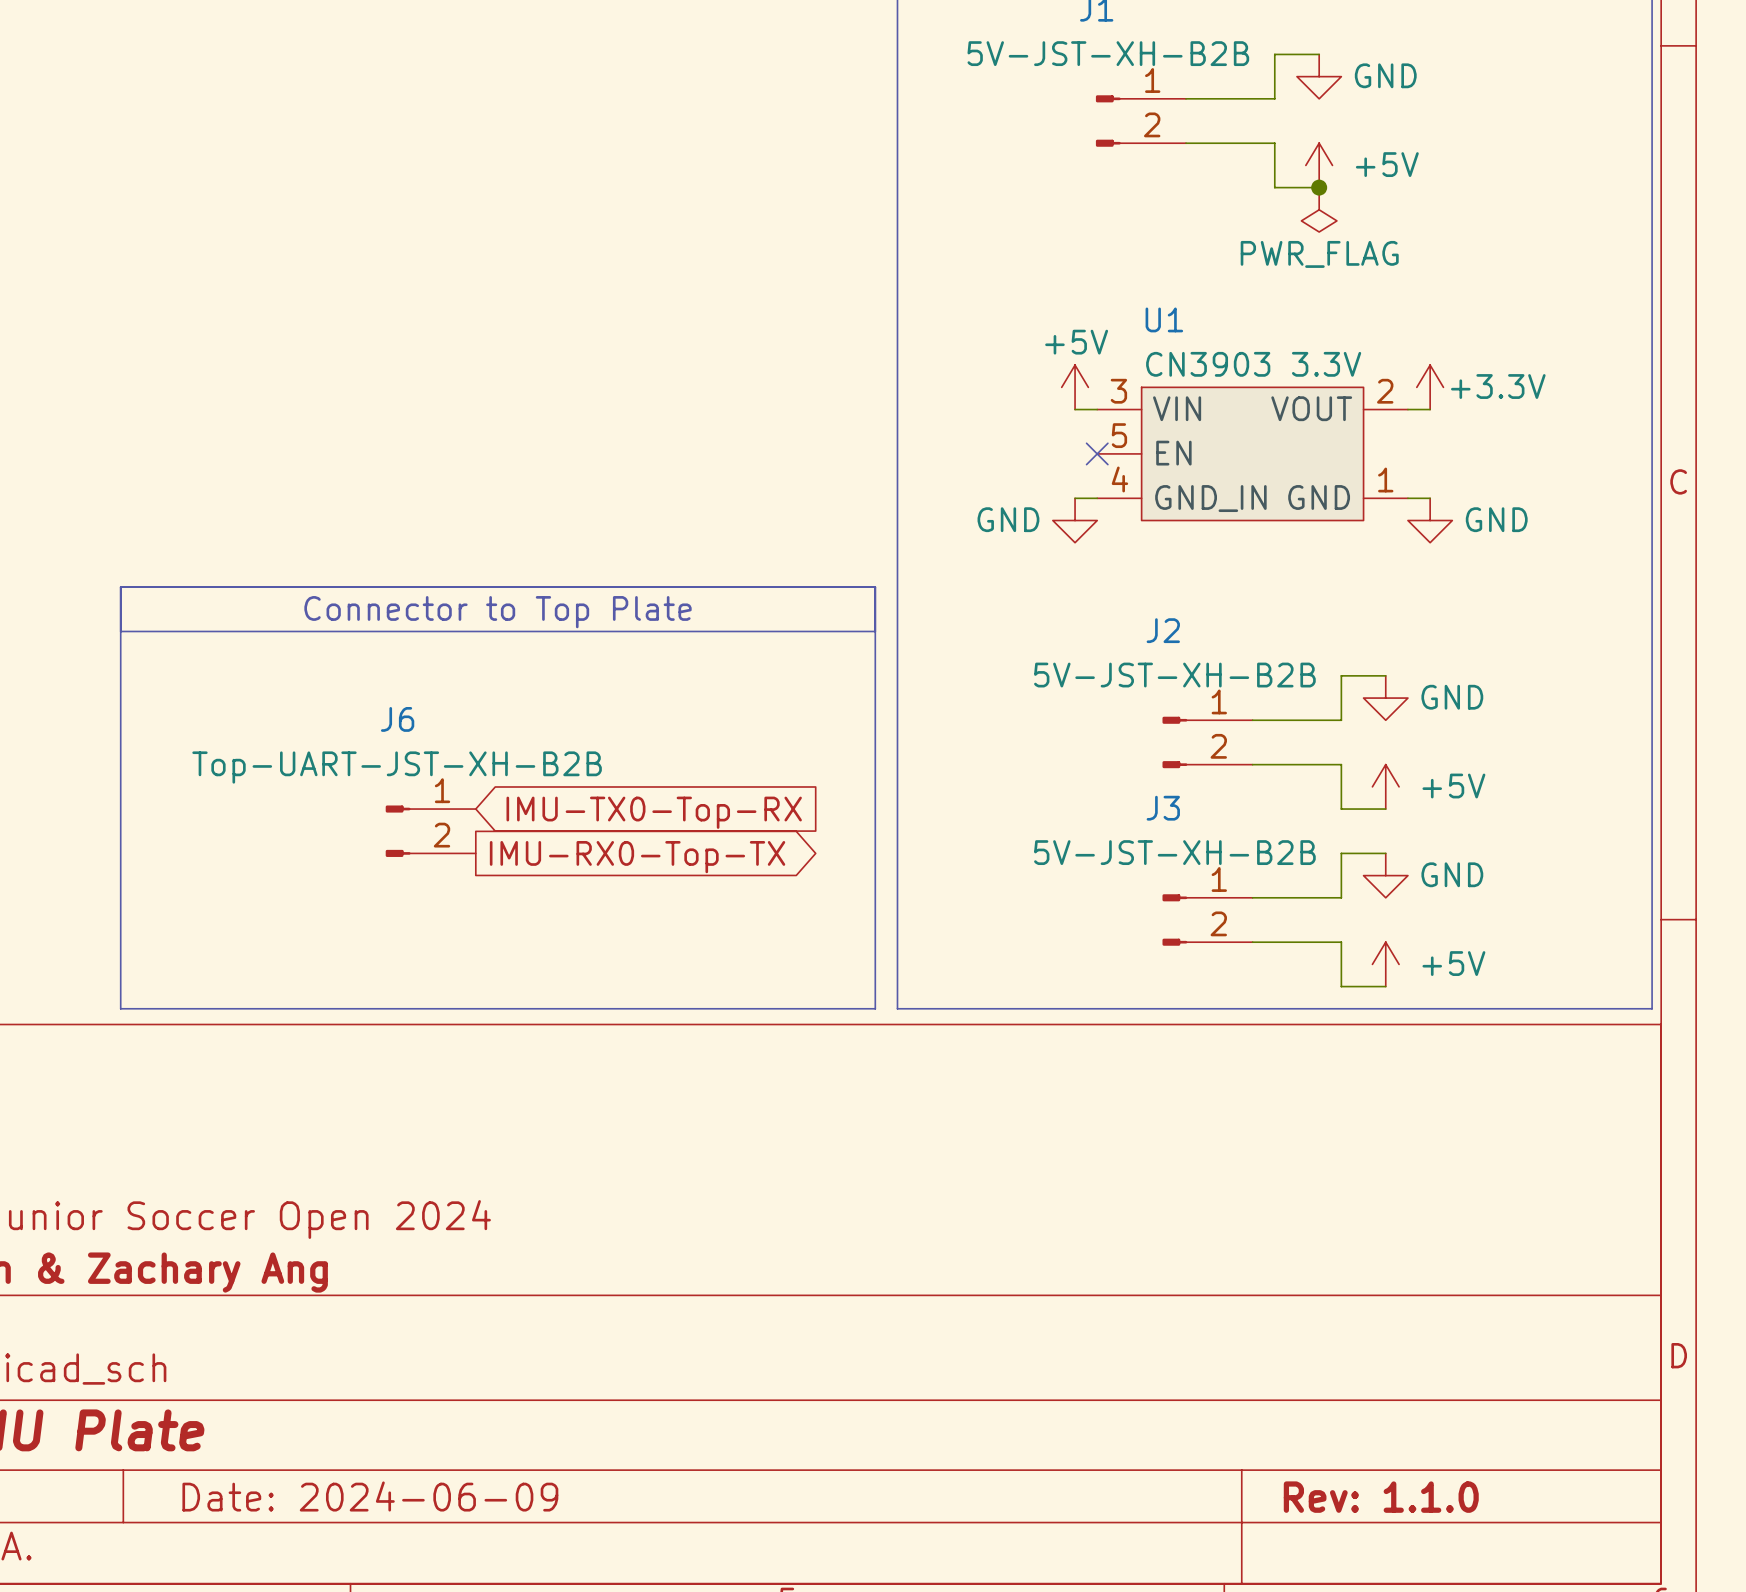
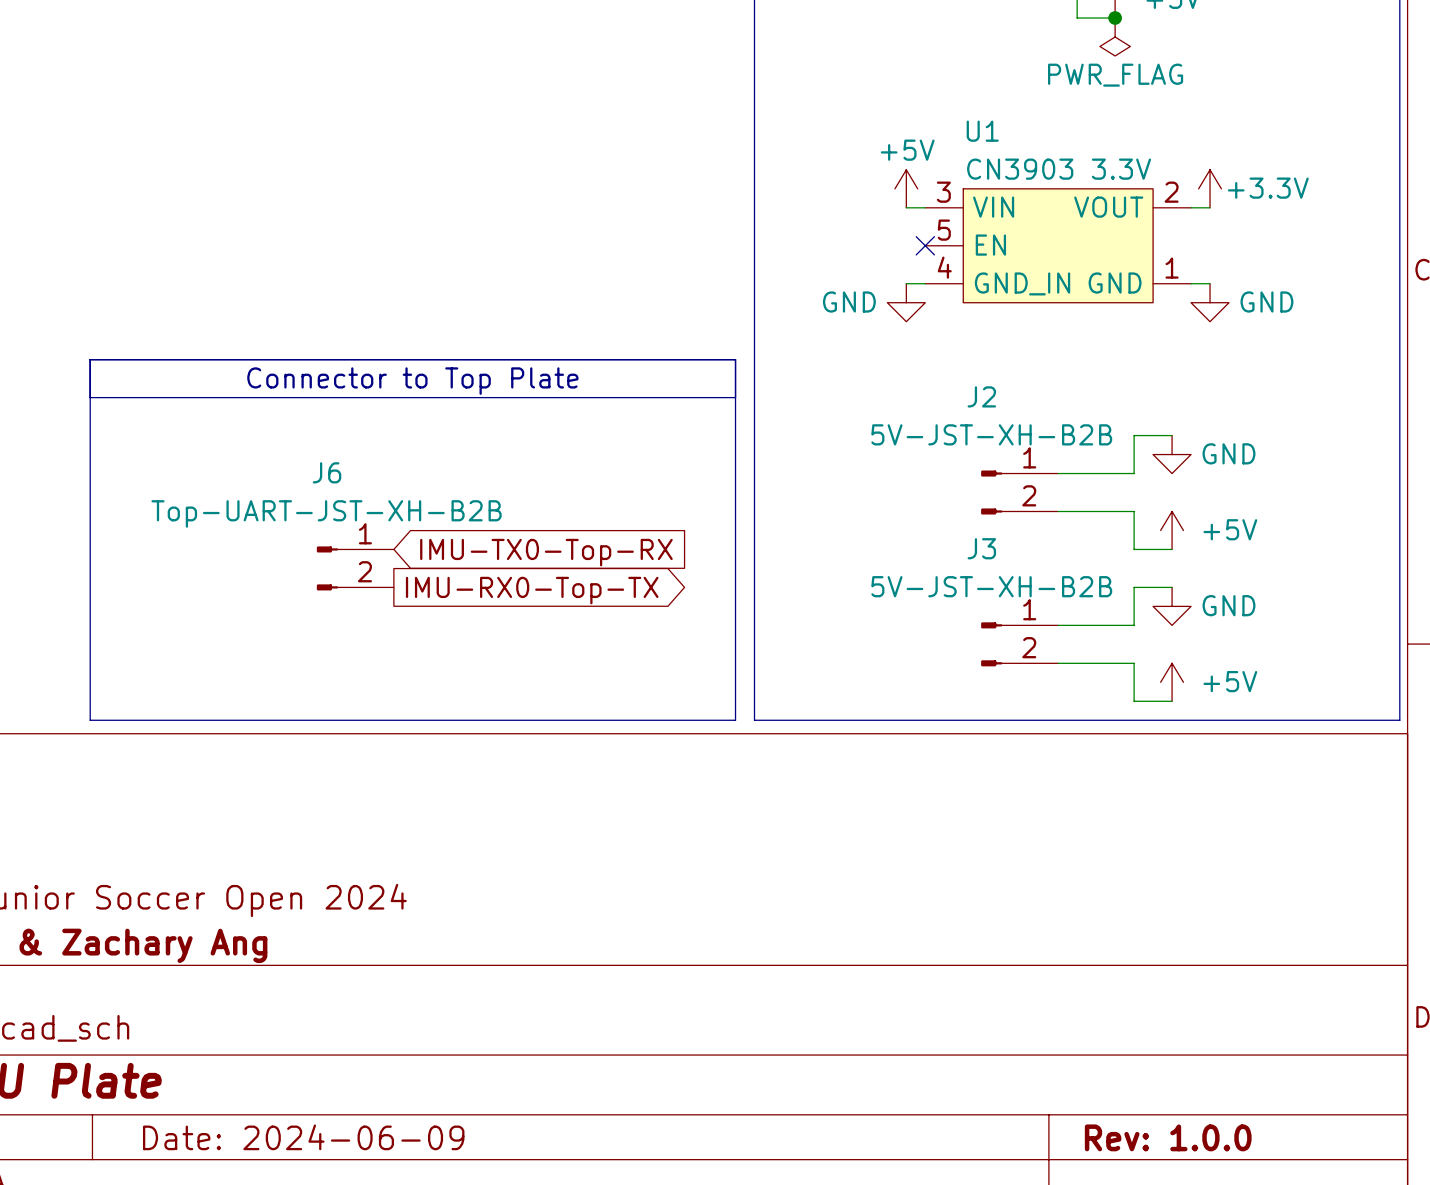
title block: Rev: 1.1.0 (1381, 1497) -> Rev: 1.0.0 (1168, 1137)

